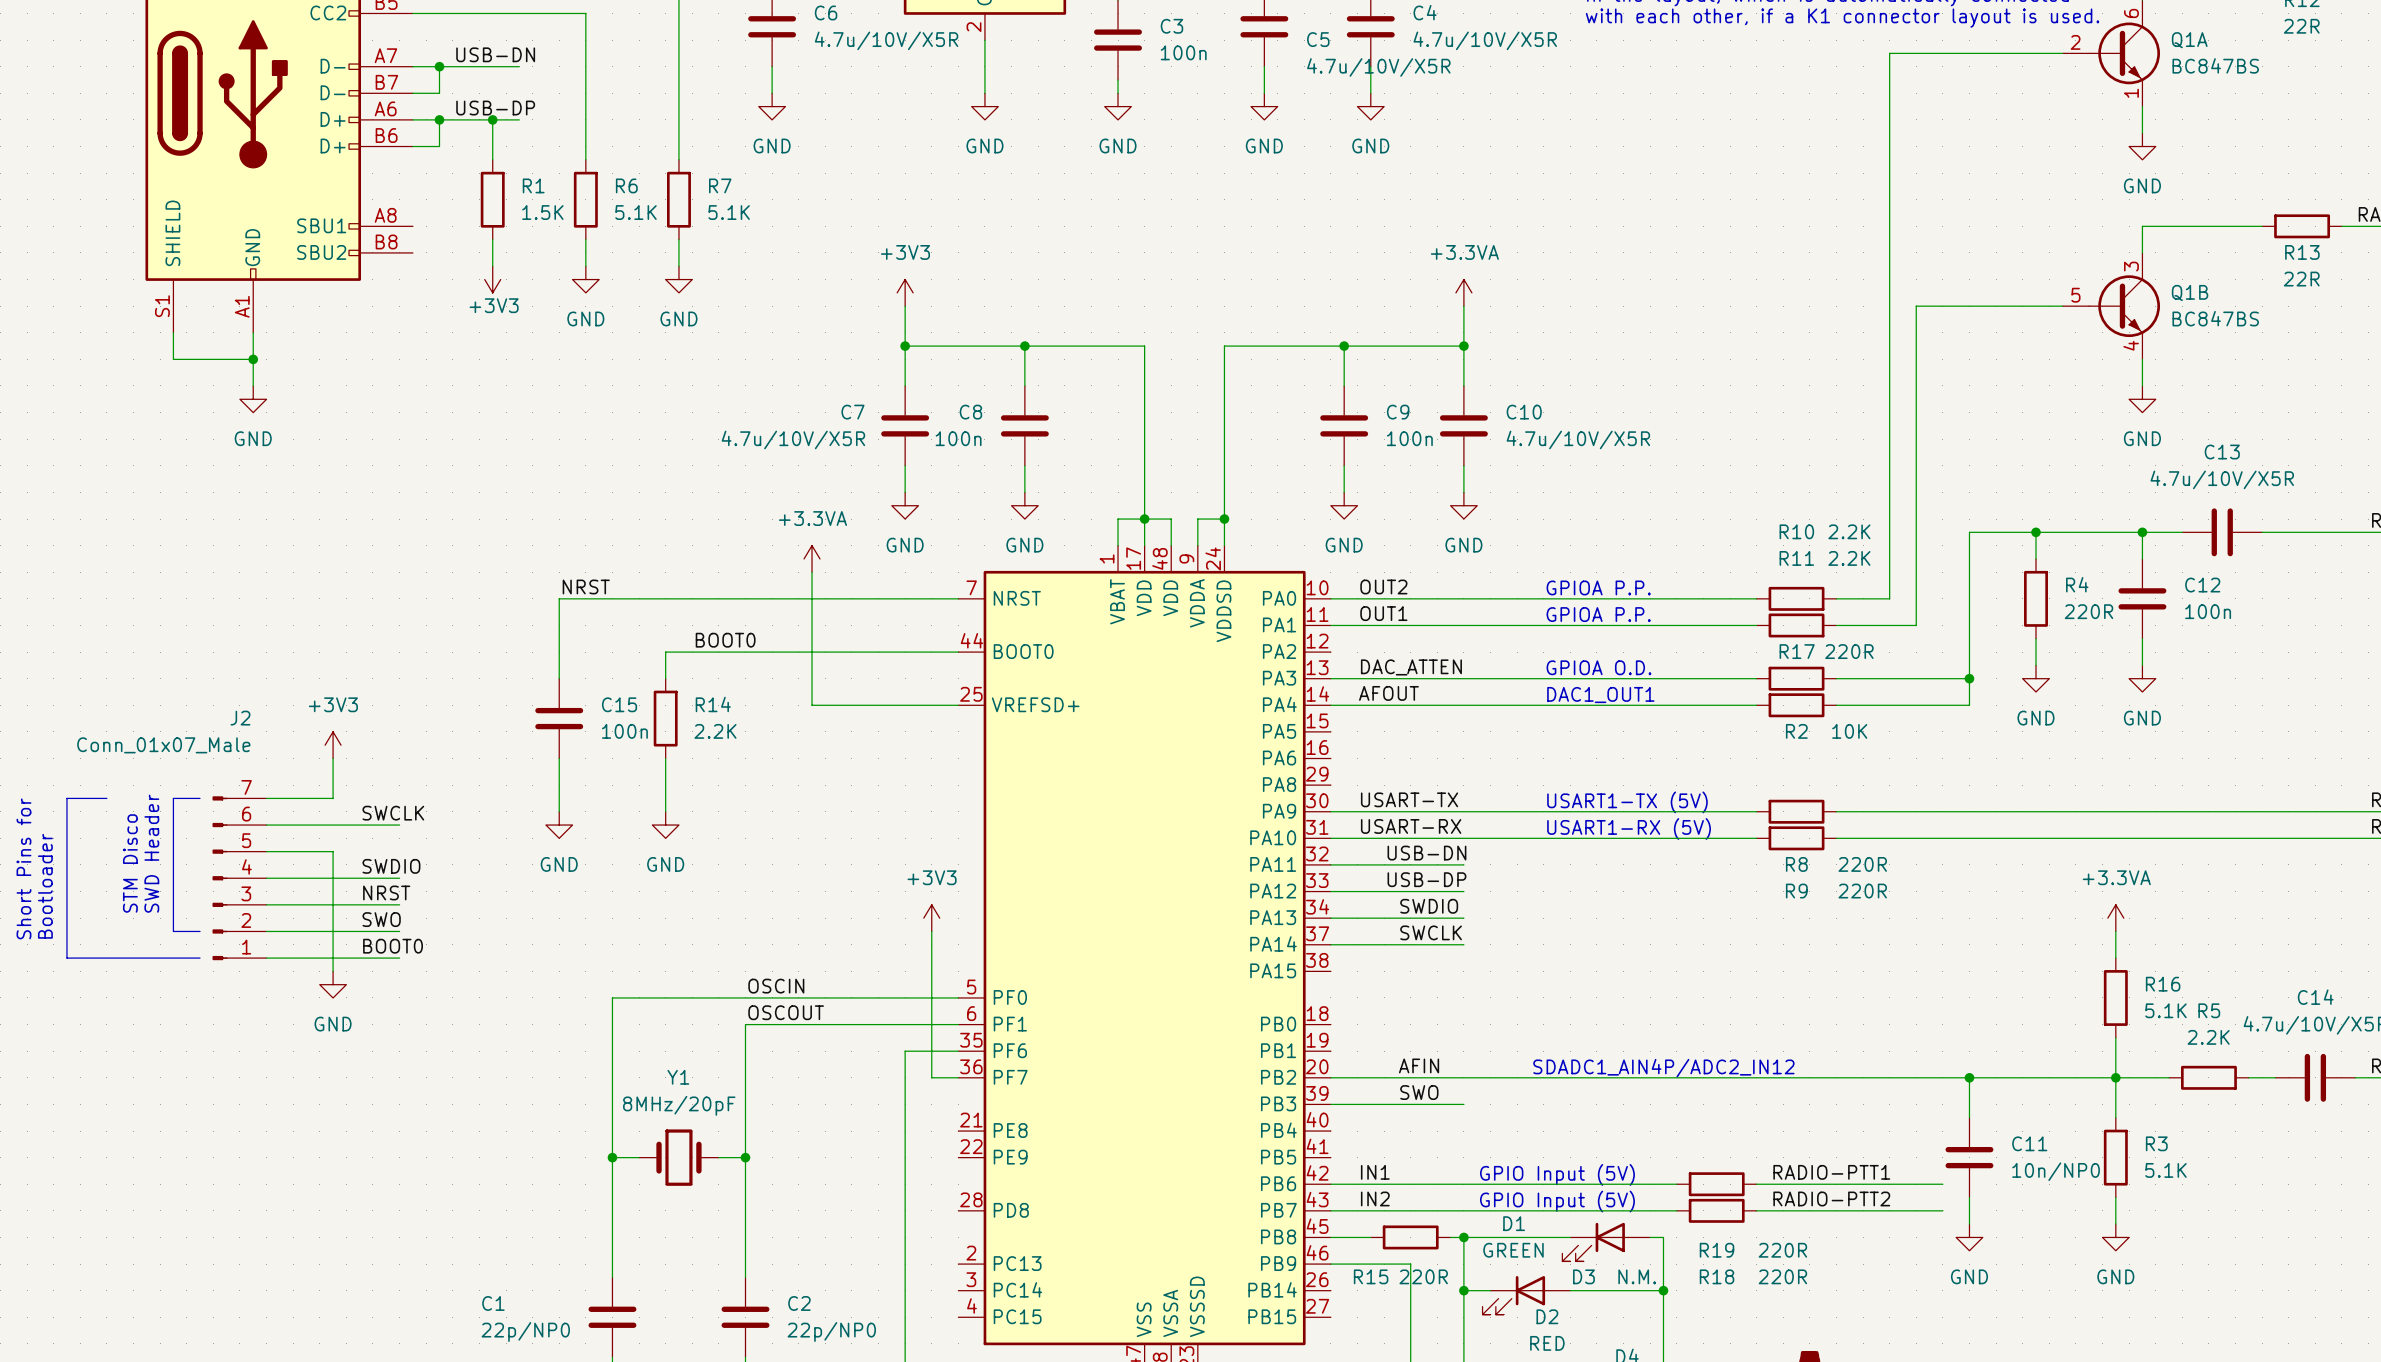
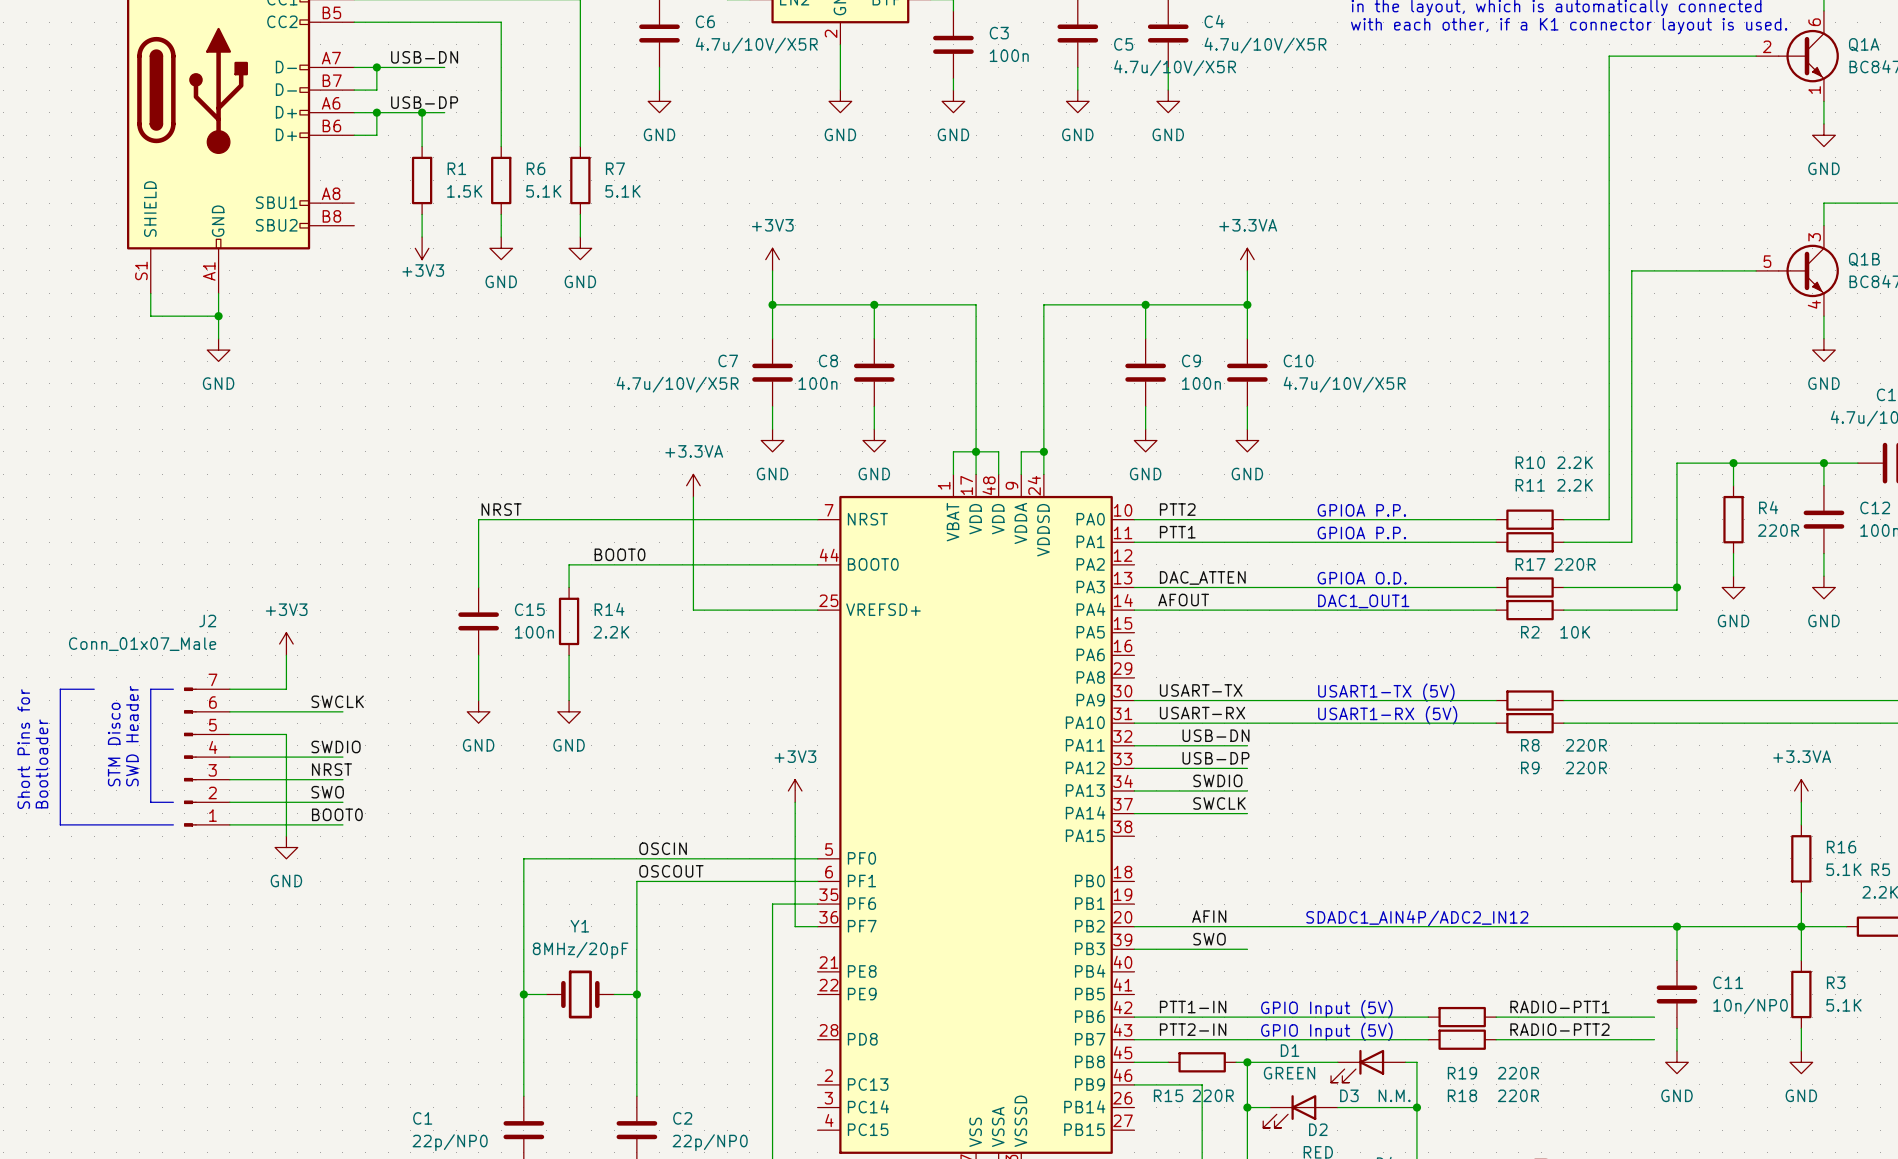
label: OUT2 (1383, 586) -> PTT2 (1177, 509)
label: OUT1 (1383, 613) -> PTT1 (1177, 532)
label: IN1 (1375, 1172) -> PTT1-IN (1193, 1007)
label: IN2 (1375, 1198) -> PTT2-IN (1193, 1029)

